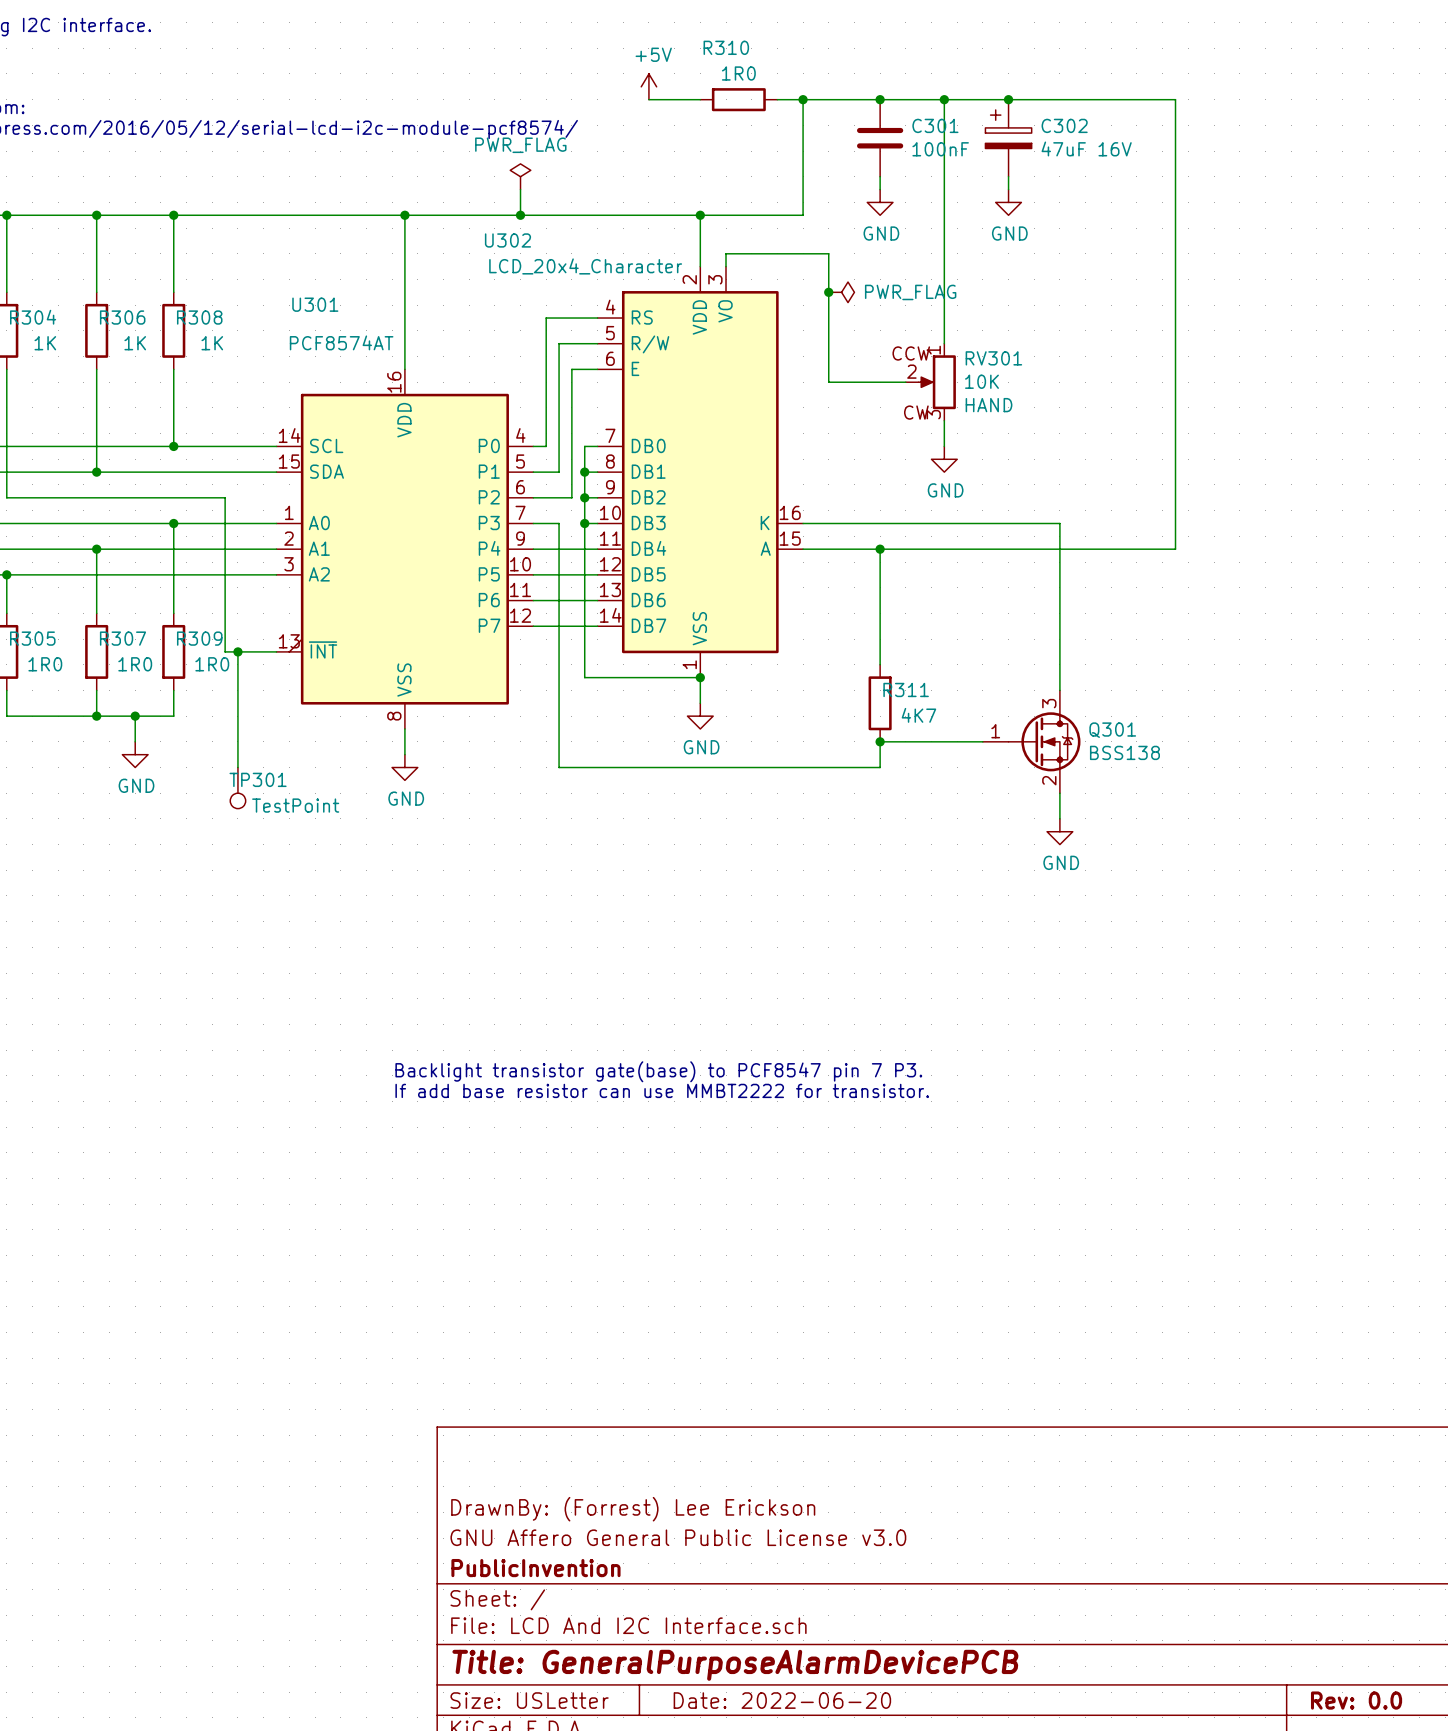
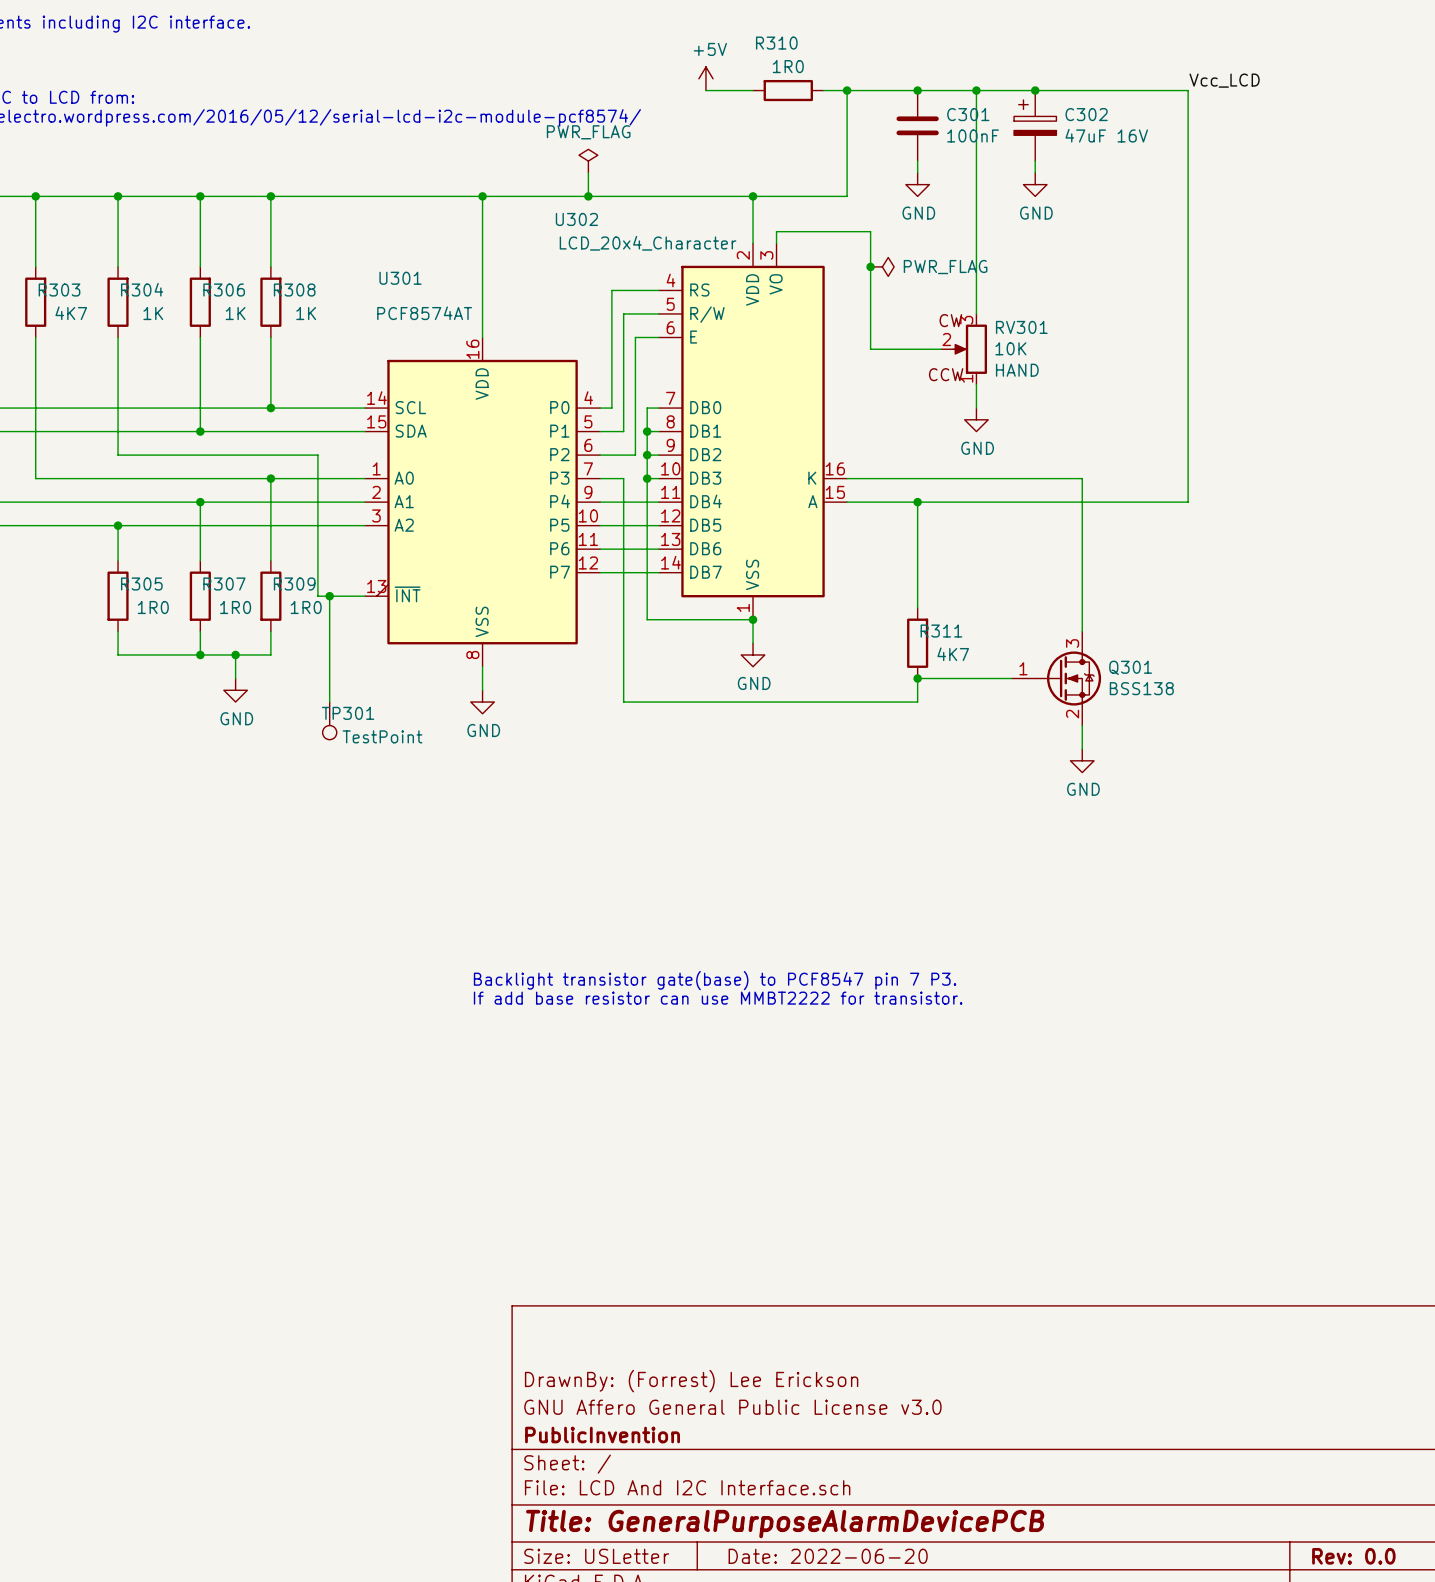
label: none -> Vcc_LCD (1224, 80)
RV301 flip: as is (937, 382) -> up-down (969, 349)

